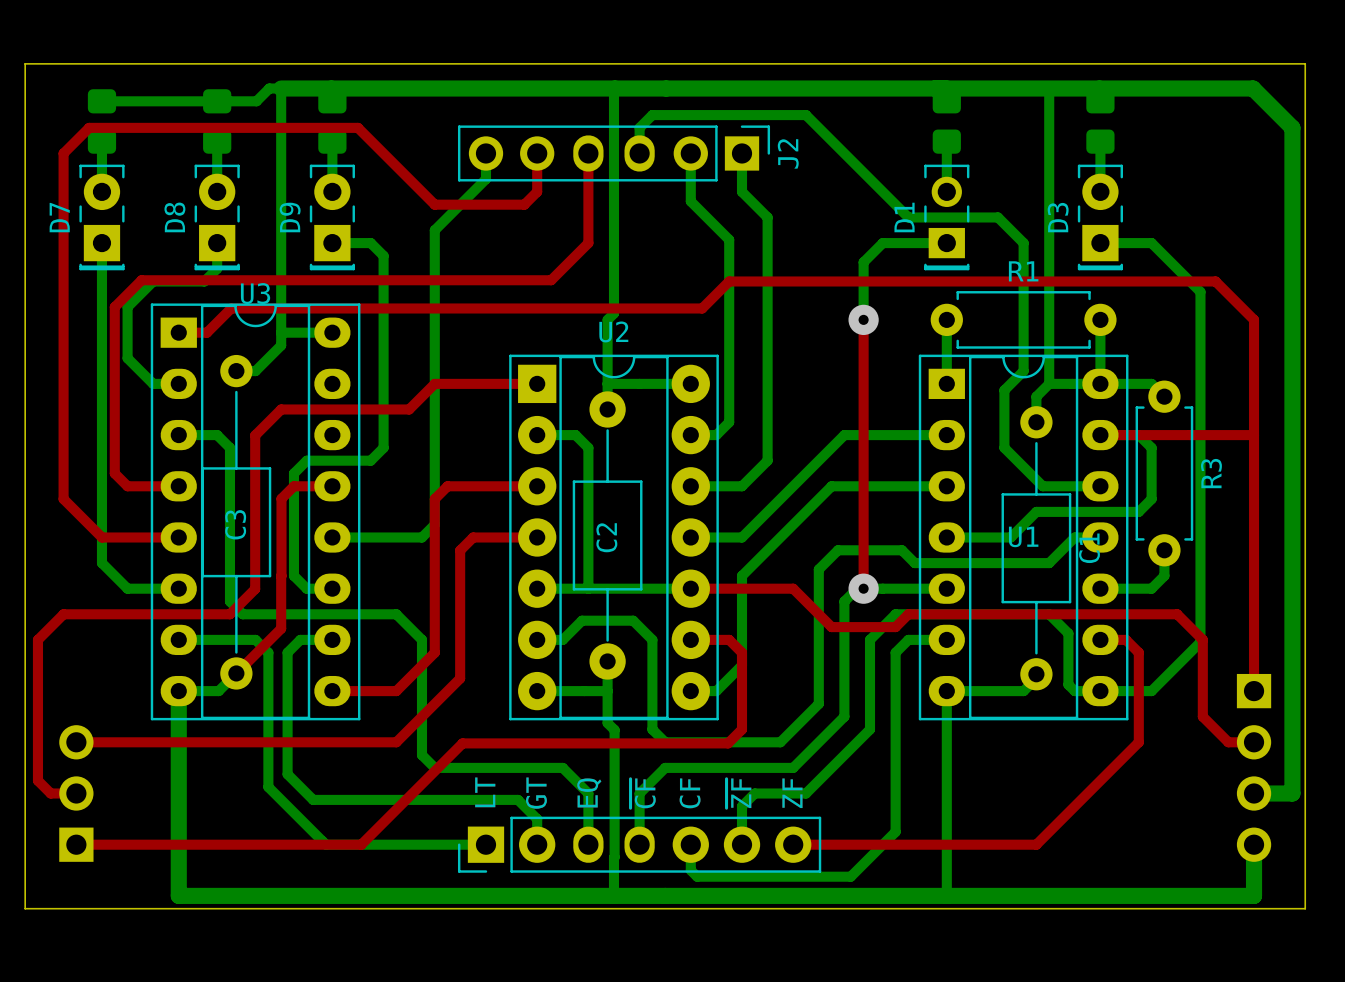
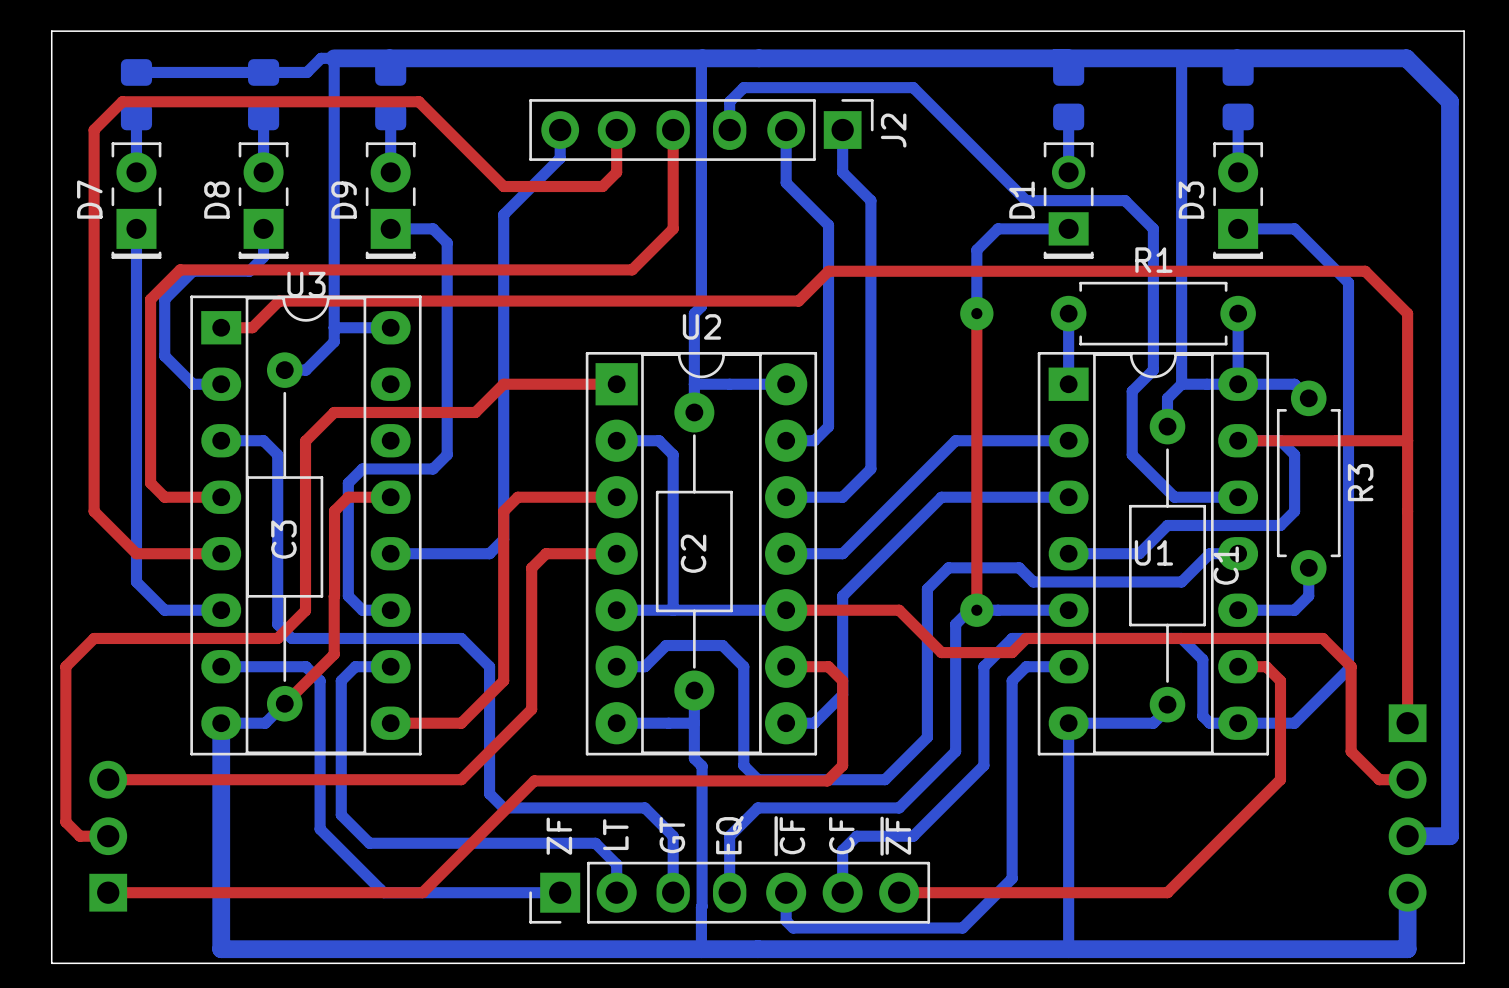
text: LT (485, 792) -> none
text: none -> LT (615, 834)
text: EQ (589, 792) -> none
text: none -> EQ (729, 835)
text: none -> ZF (559, 836)
text: GT (536, 793) -> none
text: none -> GT (672, 835)
text: ~{CF} (643, 793) -> none
text: CF (690, 793) -> none
text: none -> ~{CF} (789, 836)
text: ~{ZF} (738, 793) -> none
text: none -> CF (841, 835)
text: none -> ~{ZF} (895, 836)
text: ZF (792, 793) -> none

